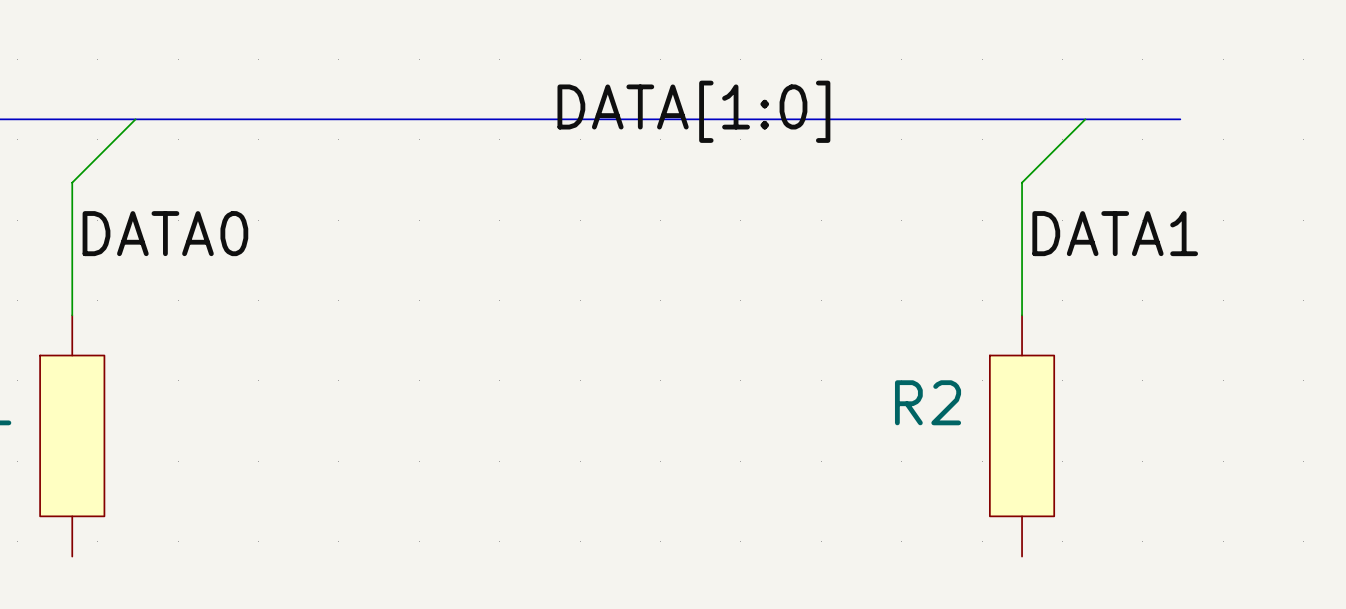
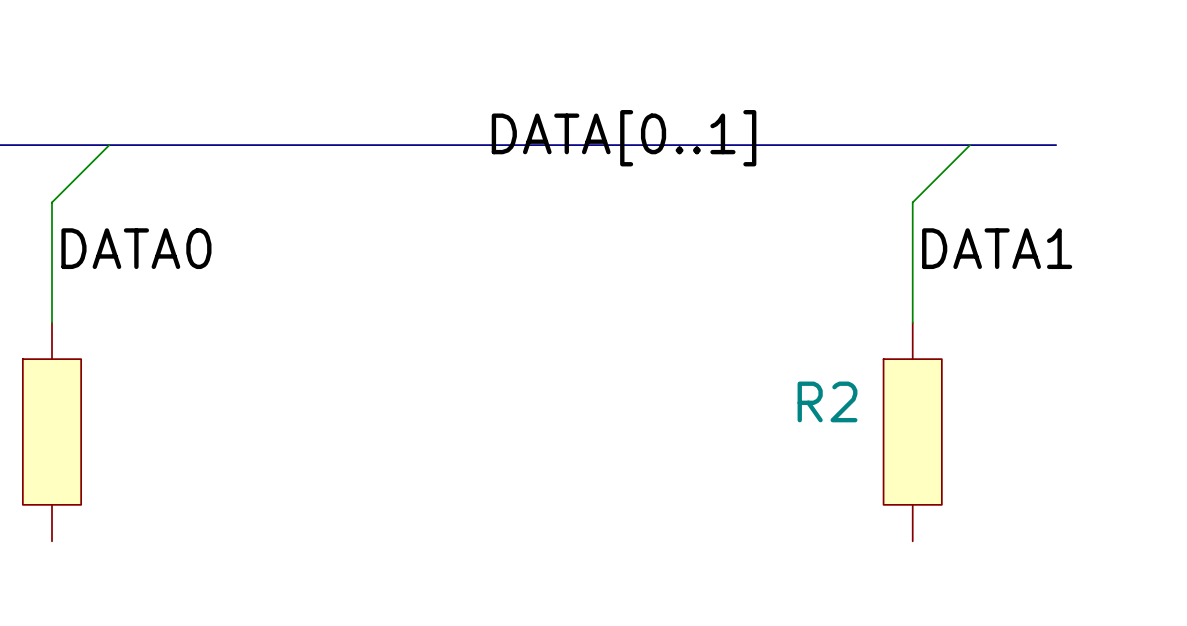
label: DATA[1:0] (693, 111) -> DATA[0..1] (624, 138)

